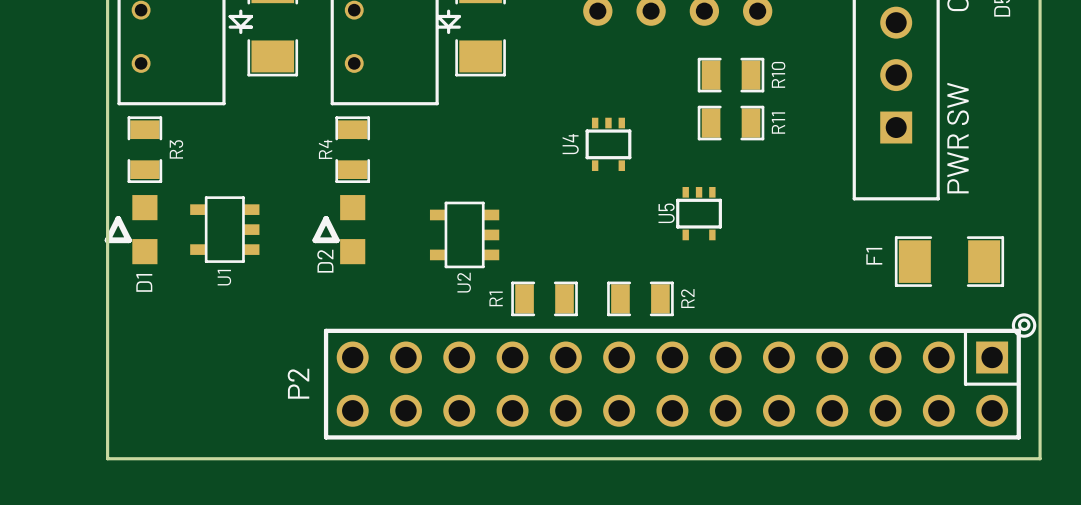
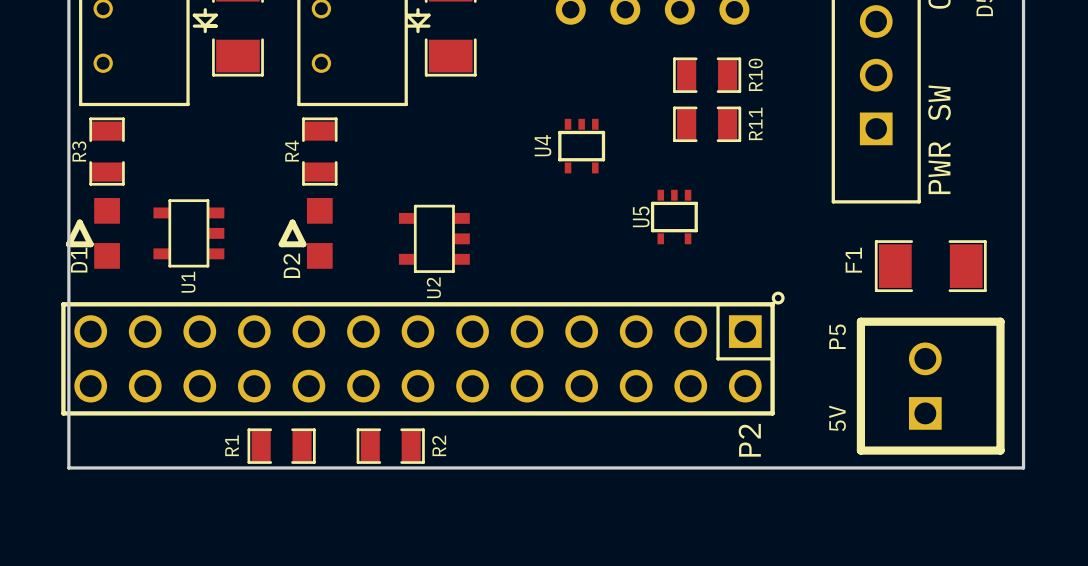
R3 name position: R3 (176, 149) -> R3 (79, 151)
D1 name position: D1 (144, 282) -> D1 (79, 260)
R1 position: (544, 298) -> (281, 446)
R2 position: (640, 298) -> (390, 446)
P2 footprint: [323, 313, 1037, 440] -> [61, 291, 785, 416]
P5: none -> 5V (930, 386)
P2 name position: P2 (298, 383) -> P2 (749, 440)

